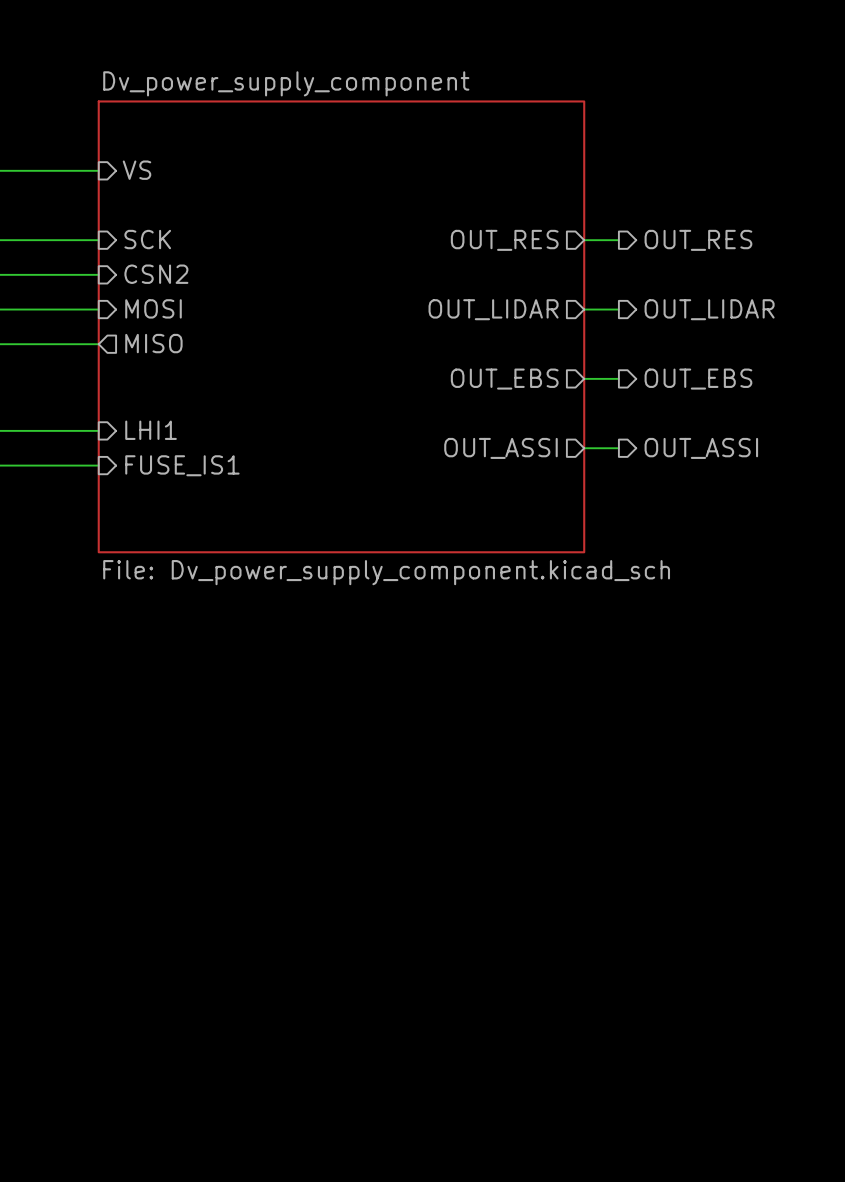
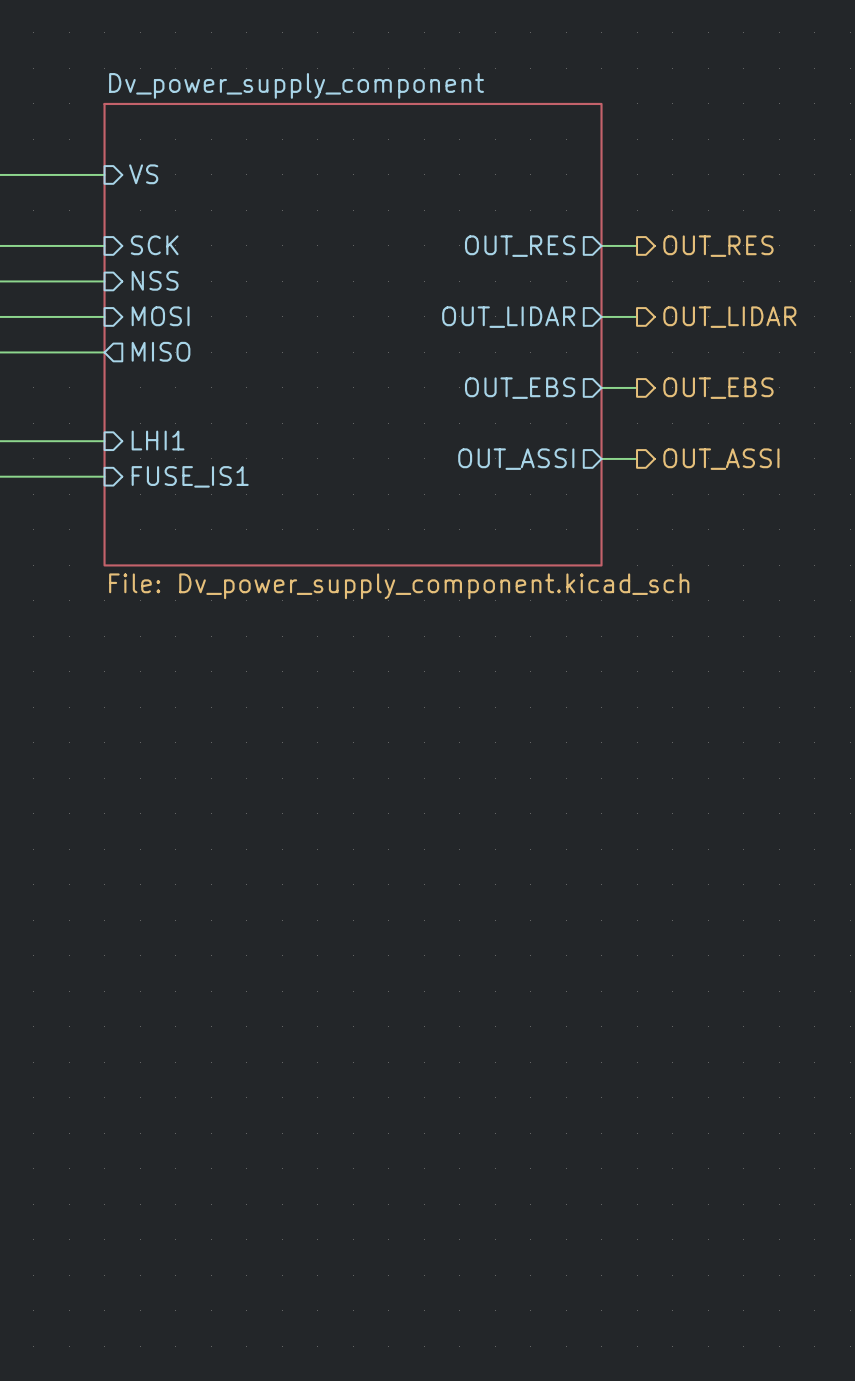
sheet pin: CSN2 (156, 274) -> NSS (155, 280)

